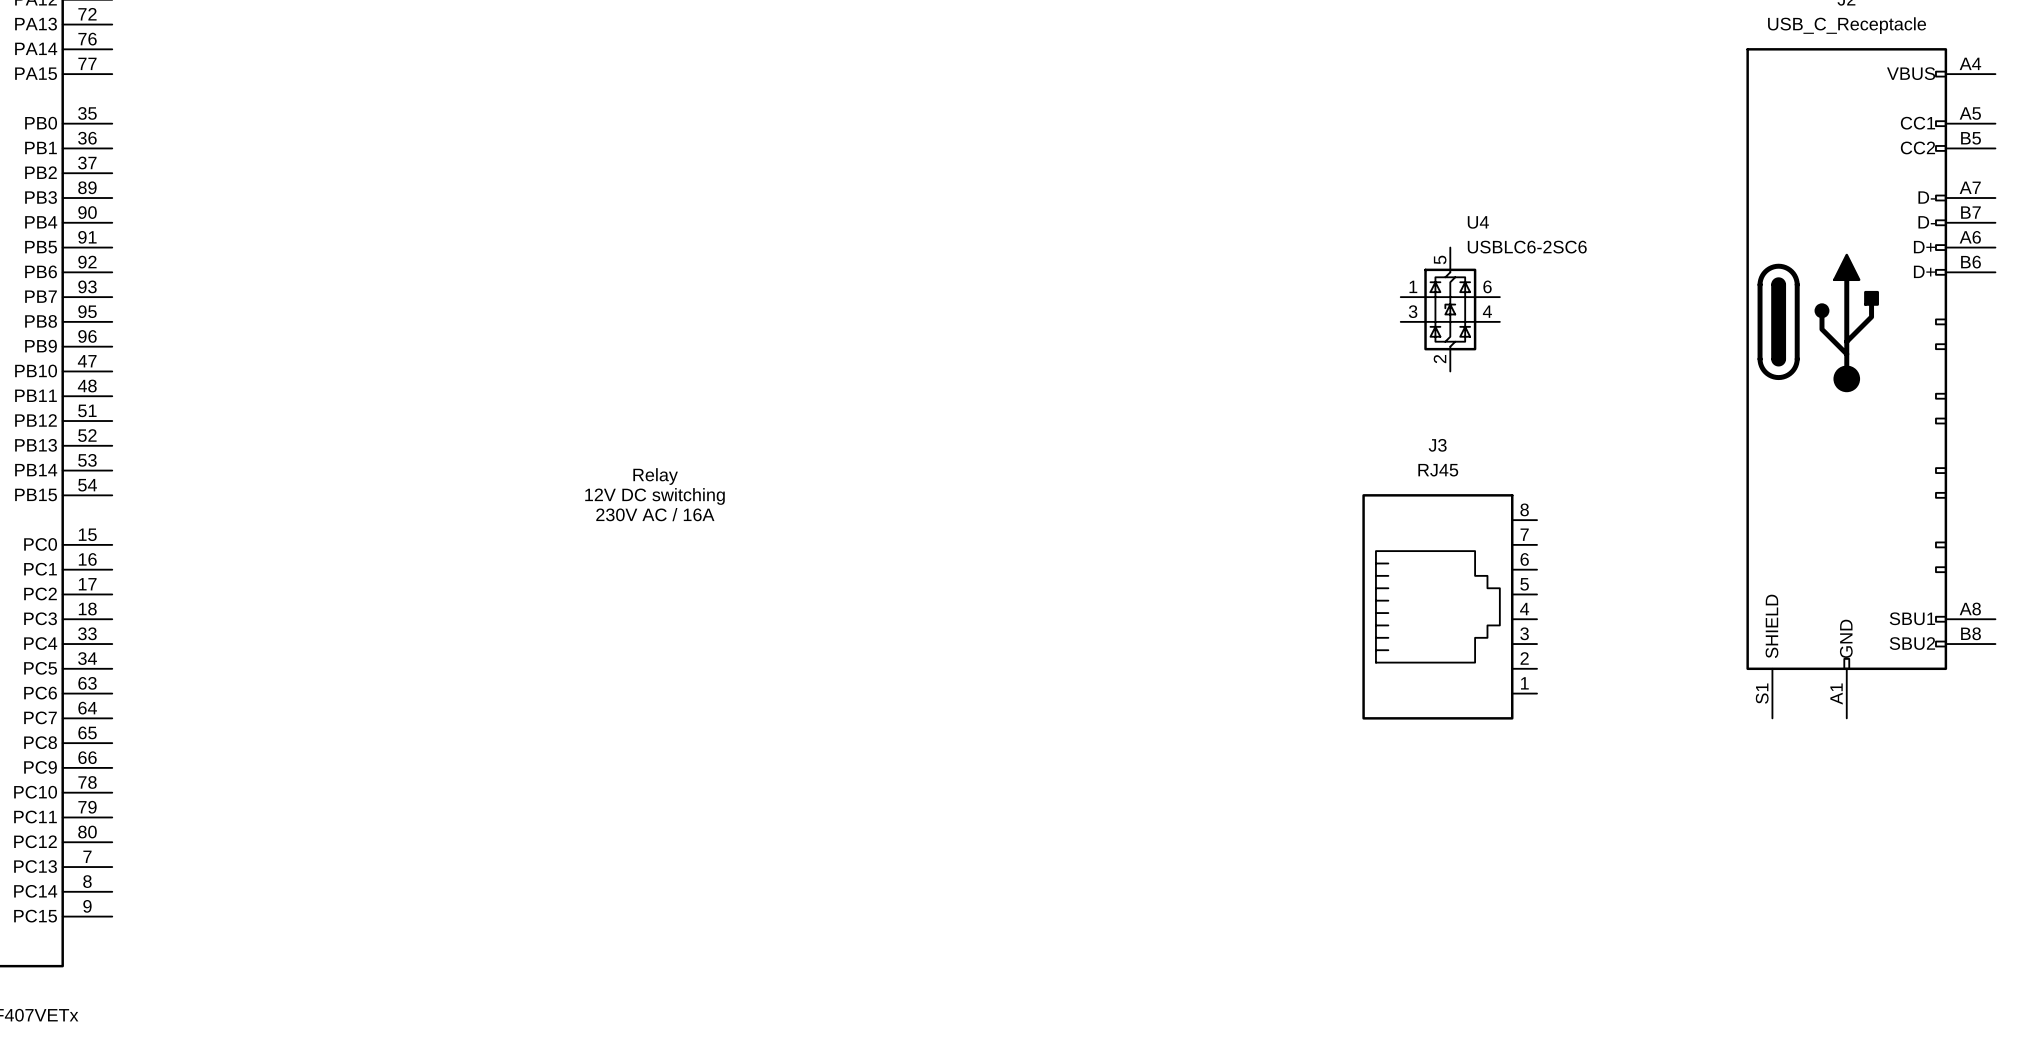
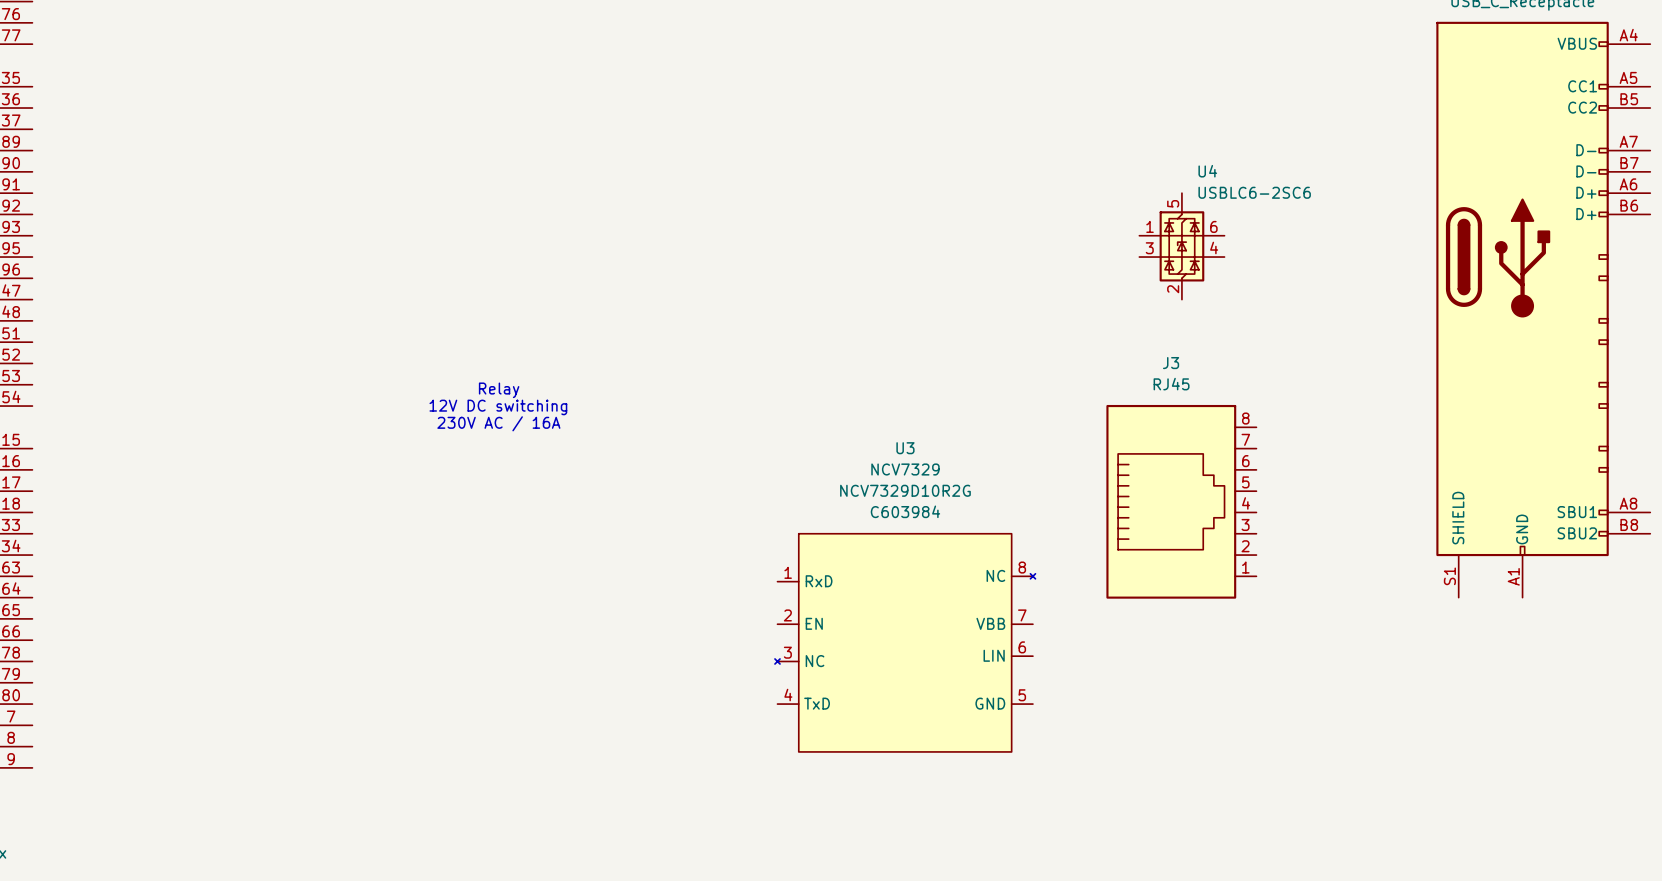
U3: none -> NCV7329 (905, 642)

